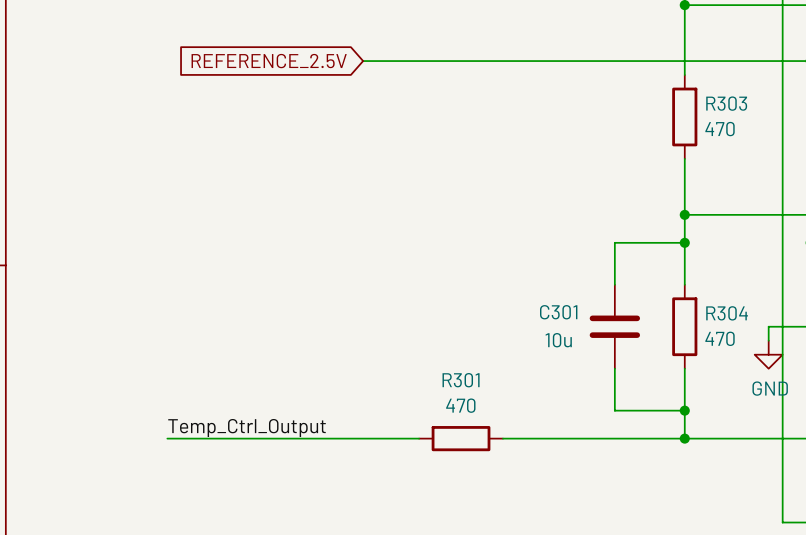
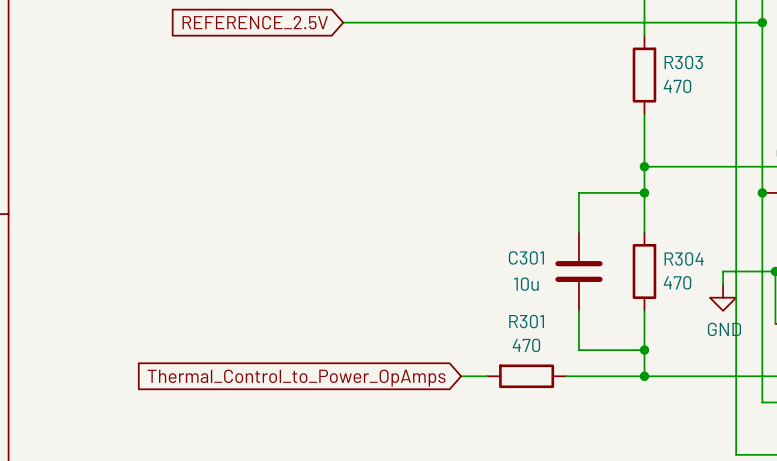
label: Temp_Ctrl_Output (247, 427) -> none
wire: (167, 438) (419, 438) -> none
R301 position: (461, 438) -> (526, 376)
wire: (516, 438) (600, 438) -> none
global label: none -> Thermal_Control_to_Power_OpAmps (296, 378)

